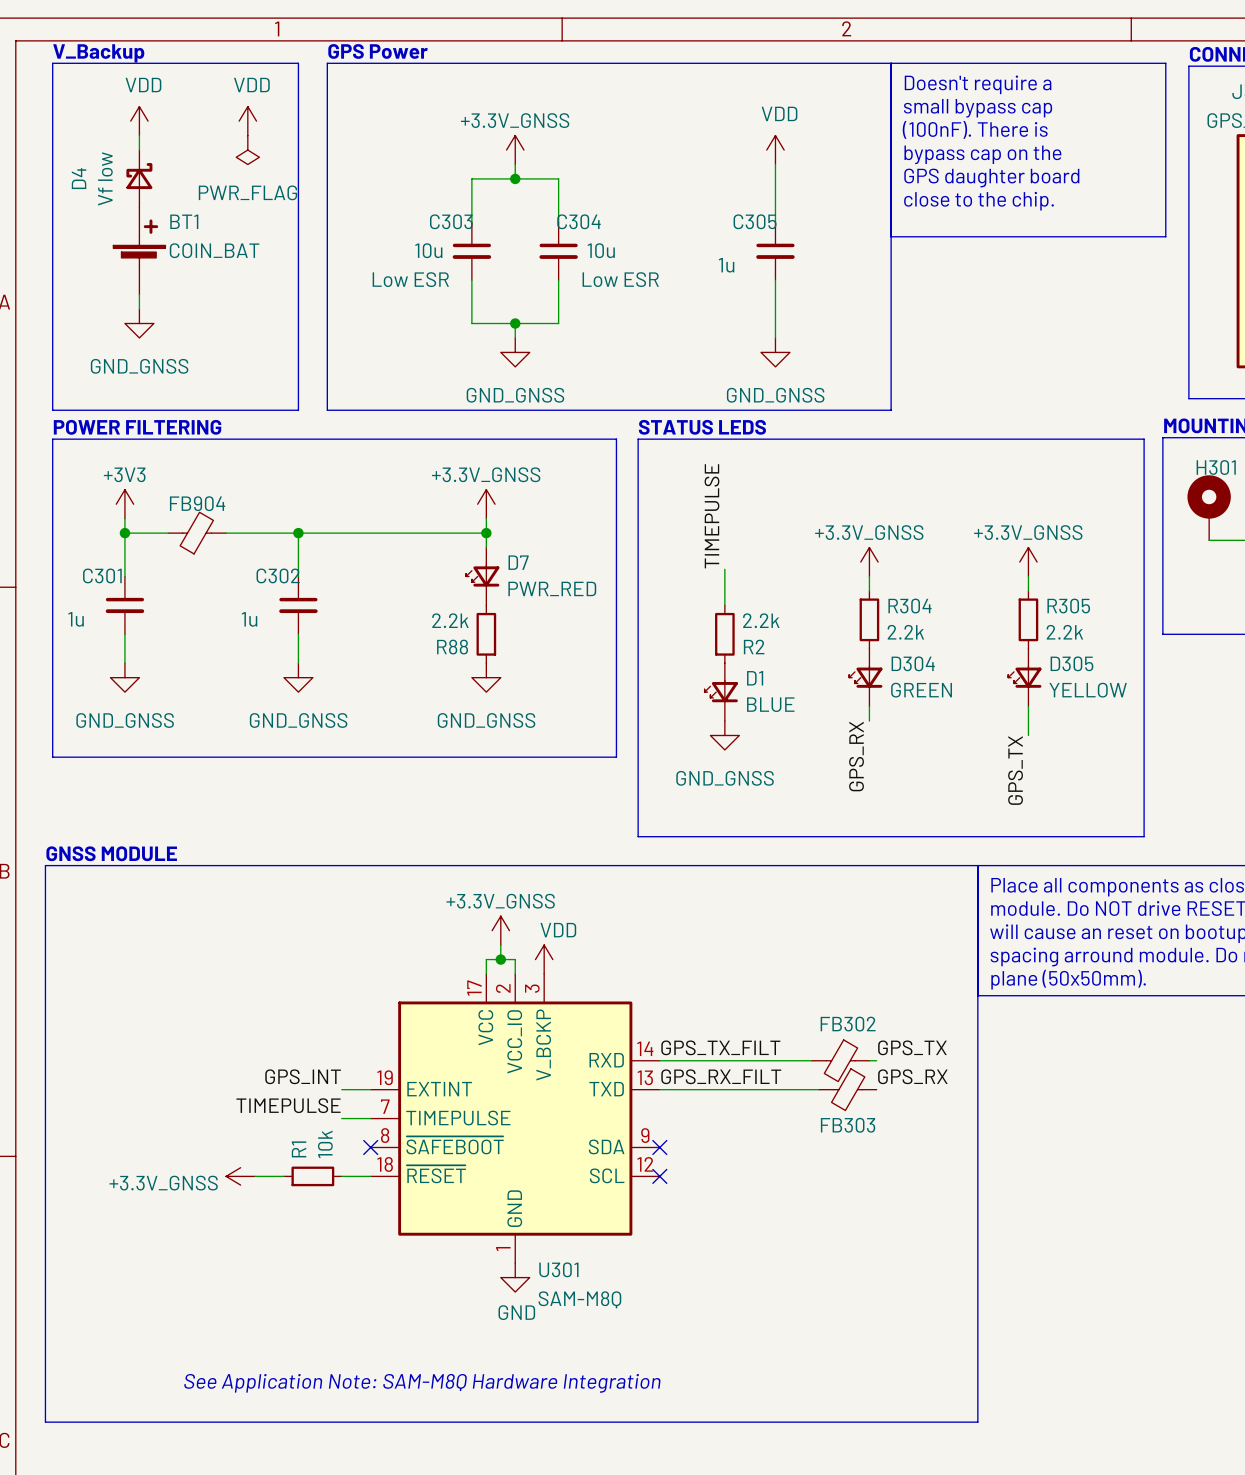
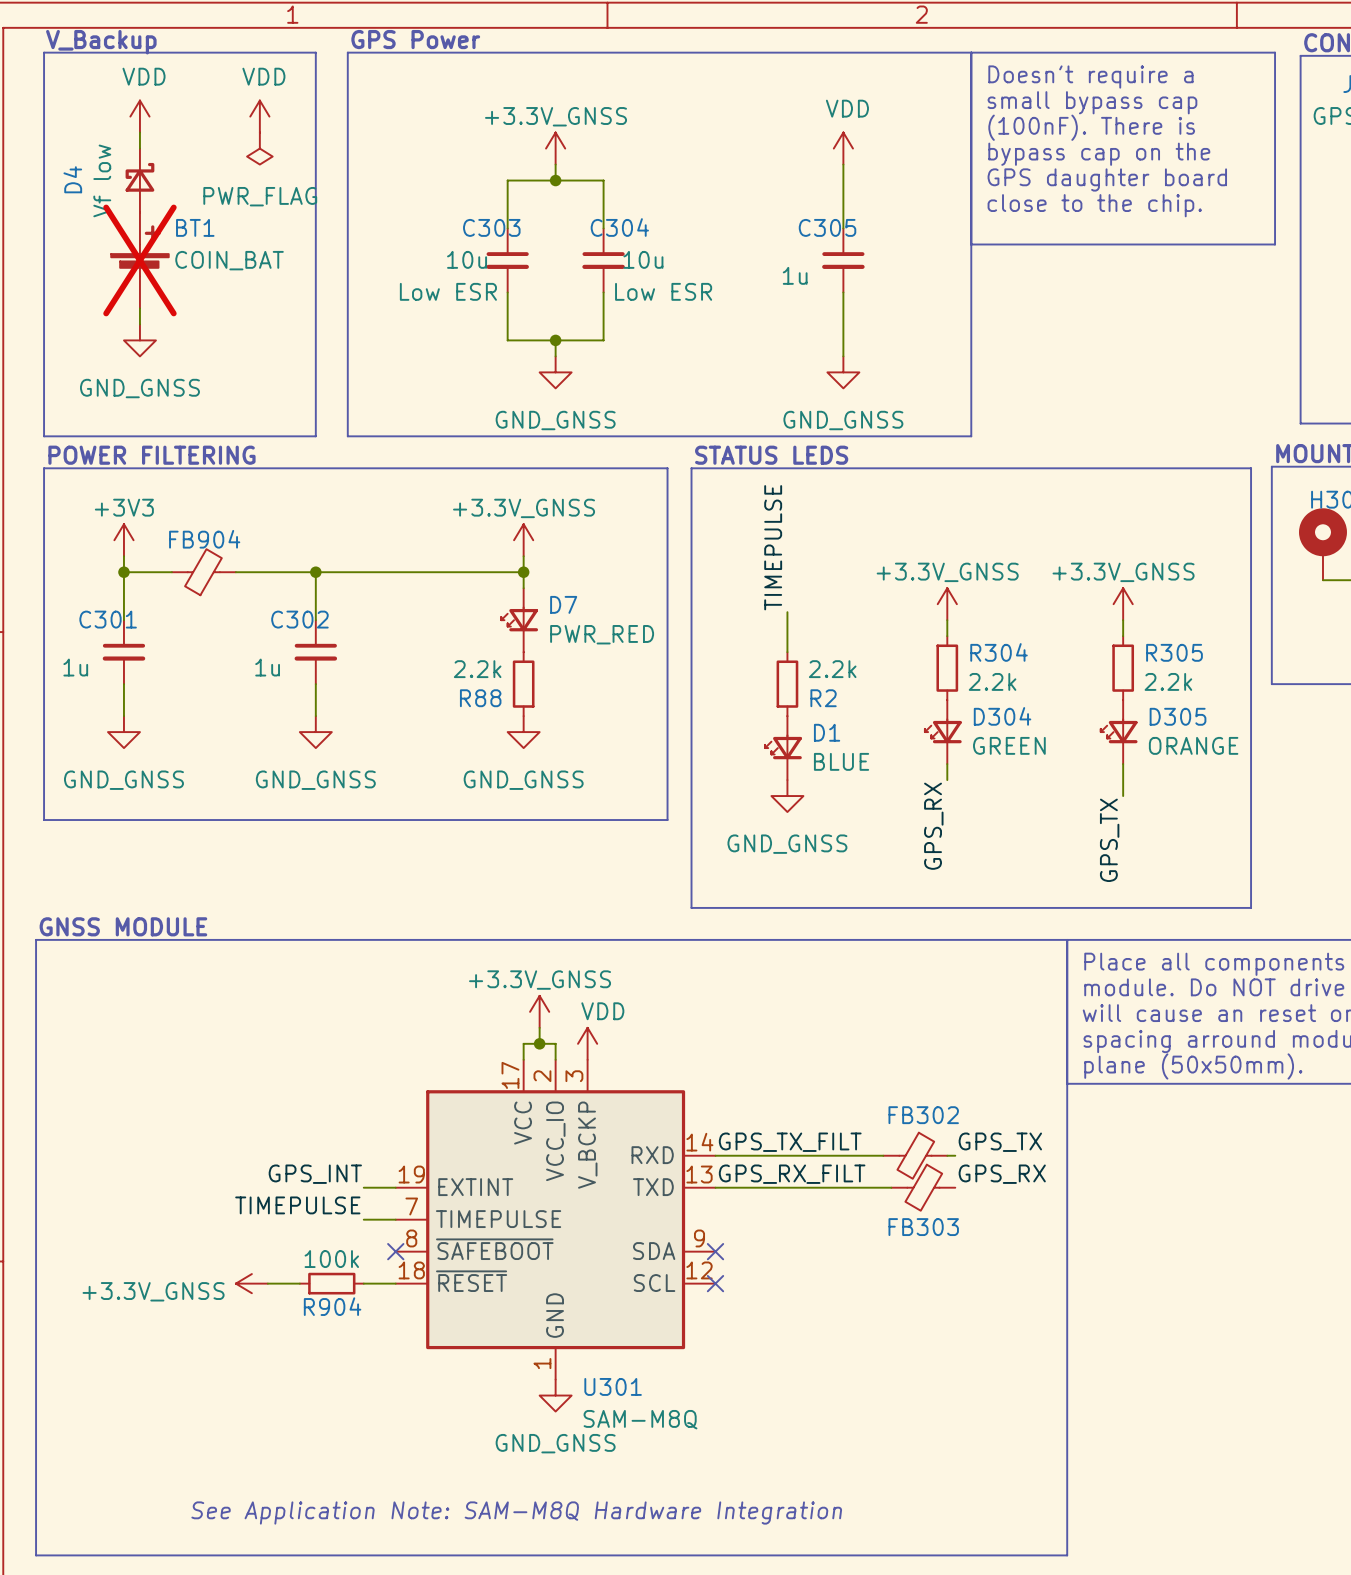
BT1 do-not-place cross: none -> (139, 260)
D305 value: YELLOW (1088, 690) -> ORANGE (1193, 745)
R1 value: 10k (325, 1144) -> 100k (331, 1259)
R1 name: R1 (299, 1149) -> R904 (332, 1306)
power symbol: GND (515, 1277) -> GND_GNSS (555, 1395)

